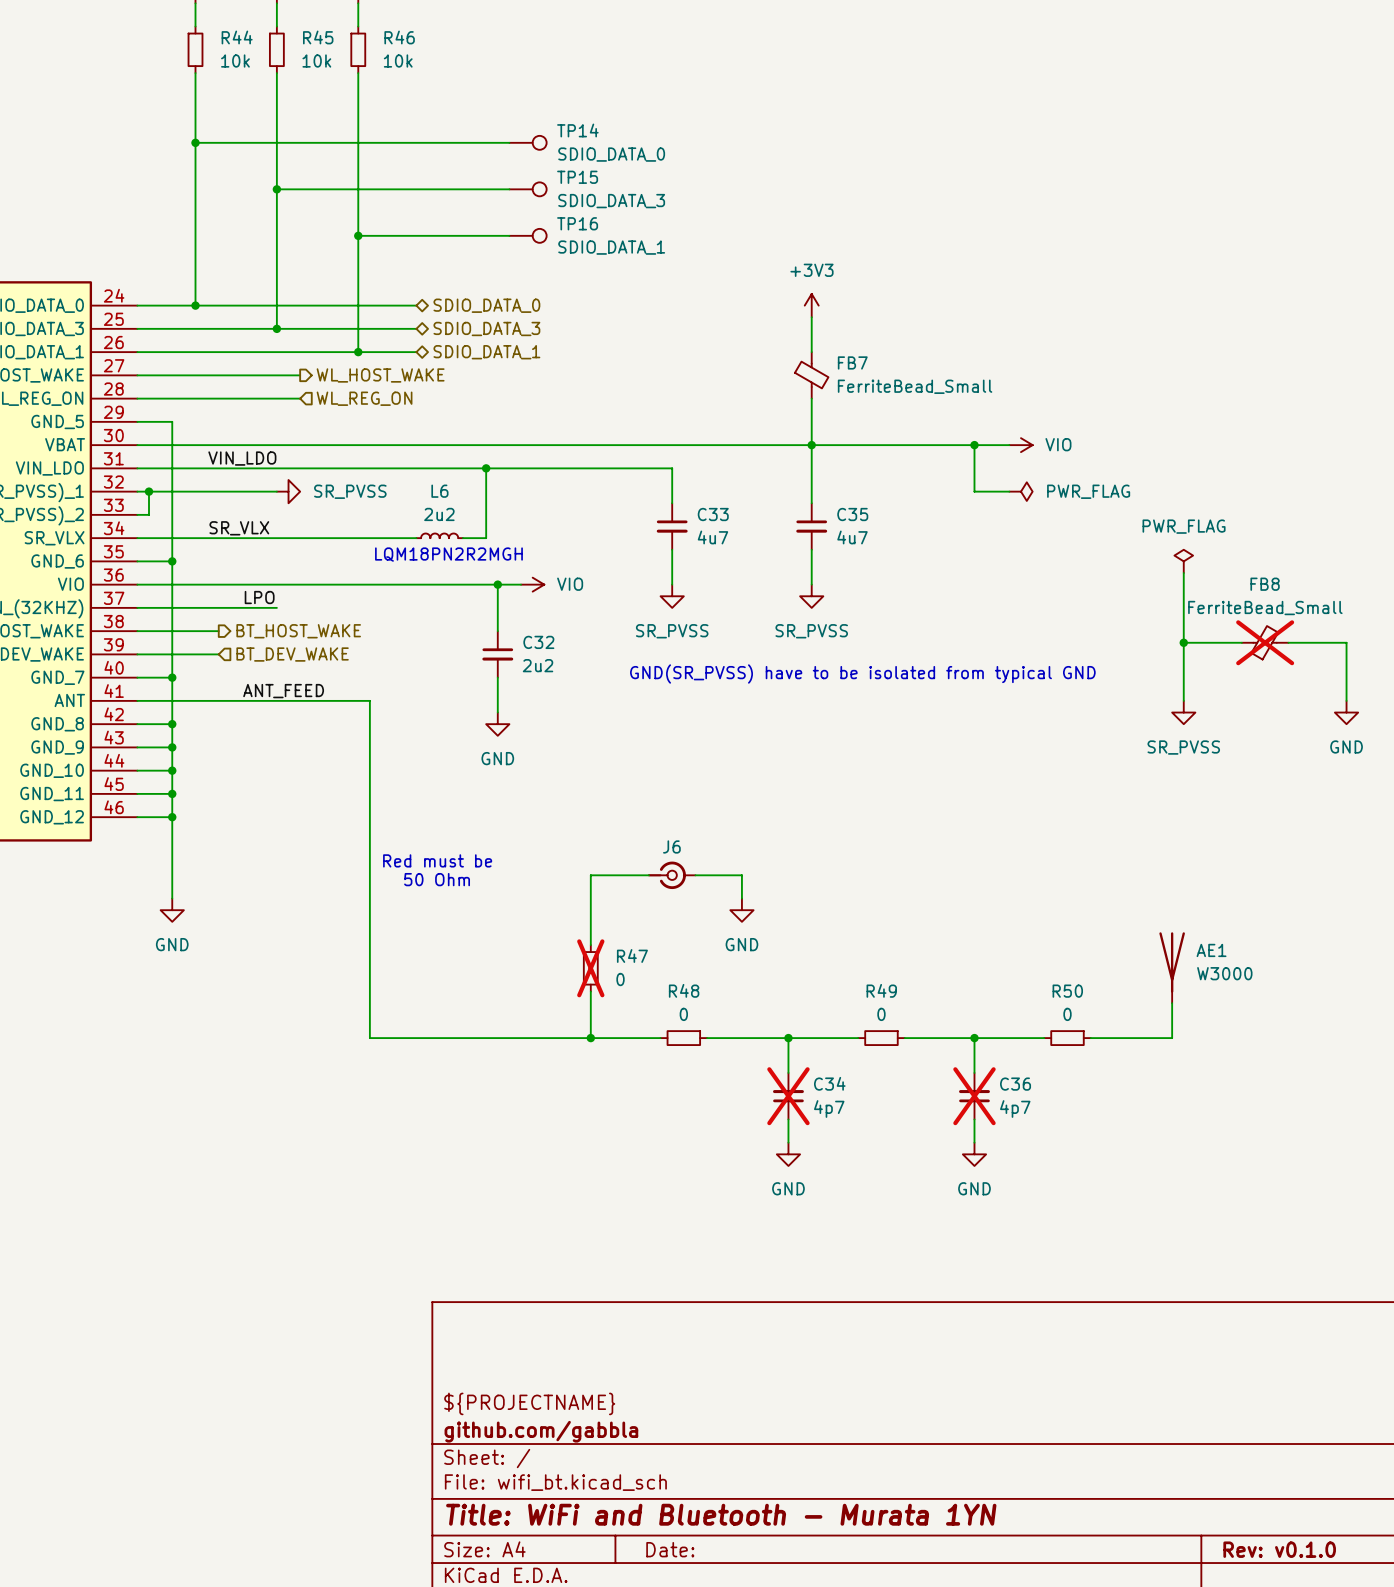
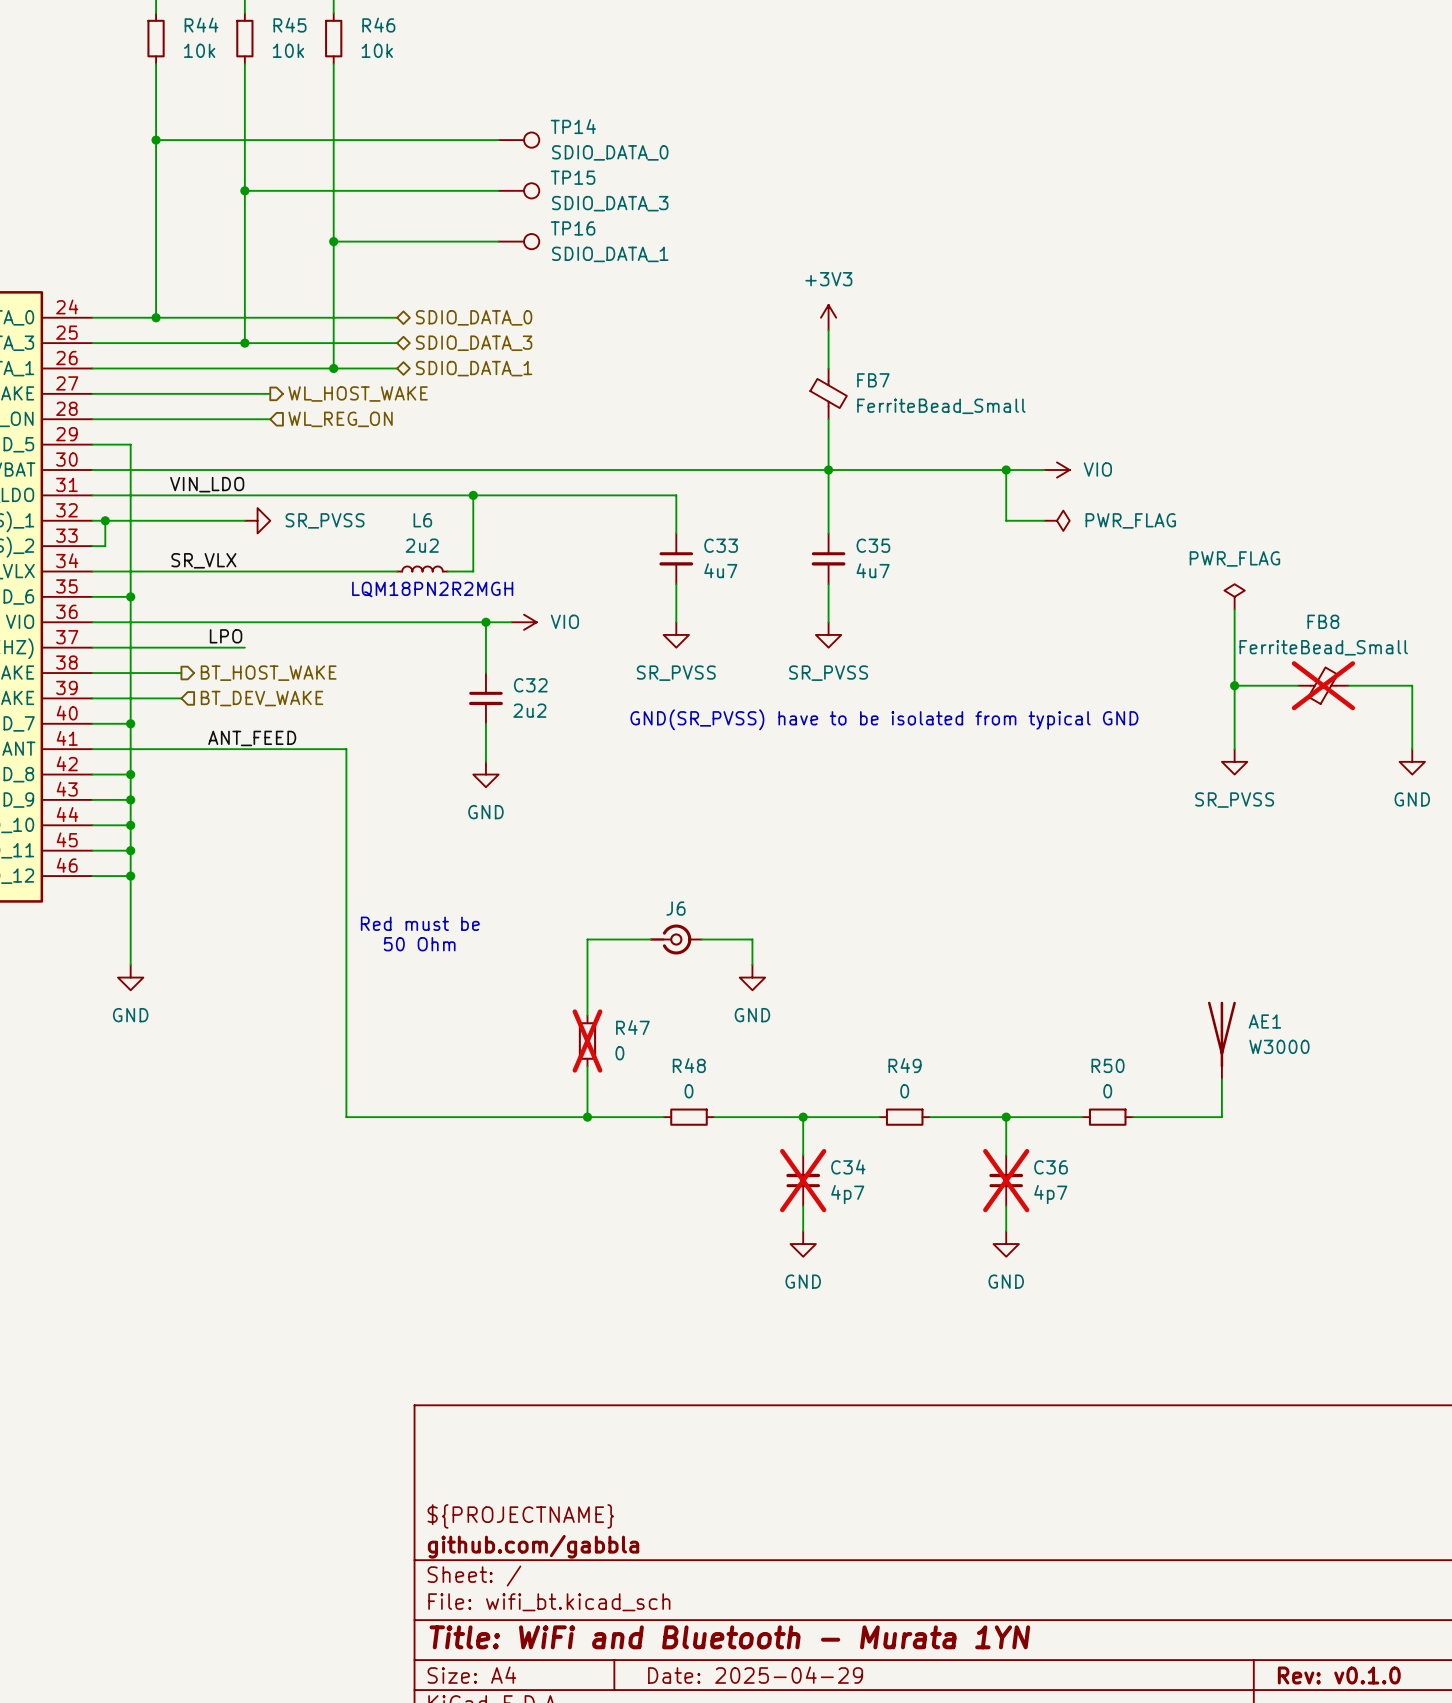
title block: Date: (670, 1549) -> Date: 2025-04-29 (755, 1675)

